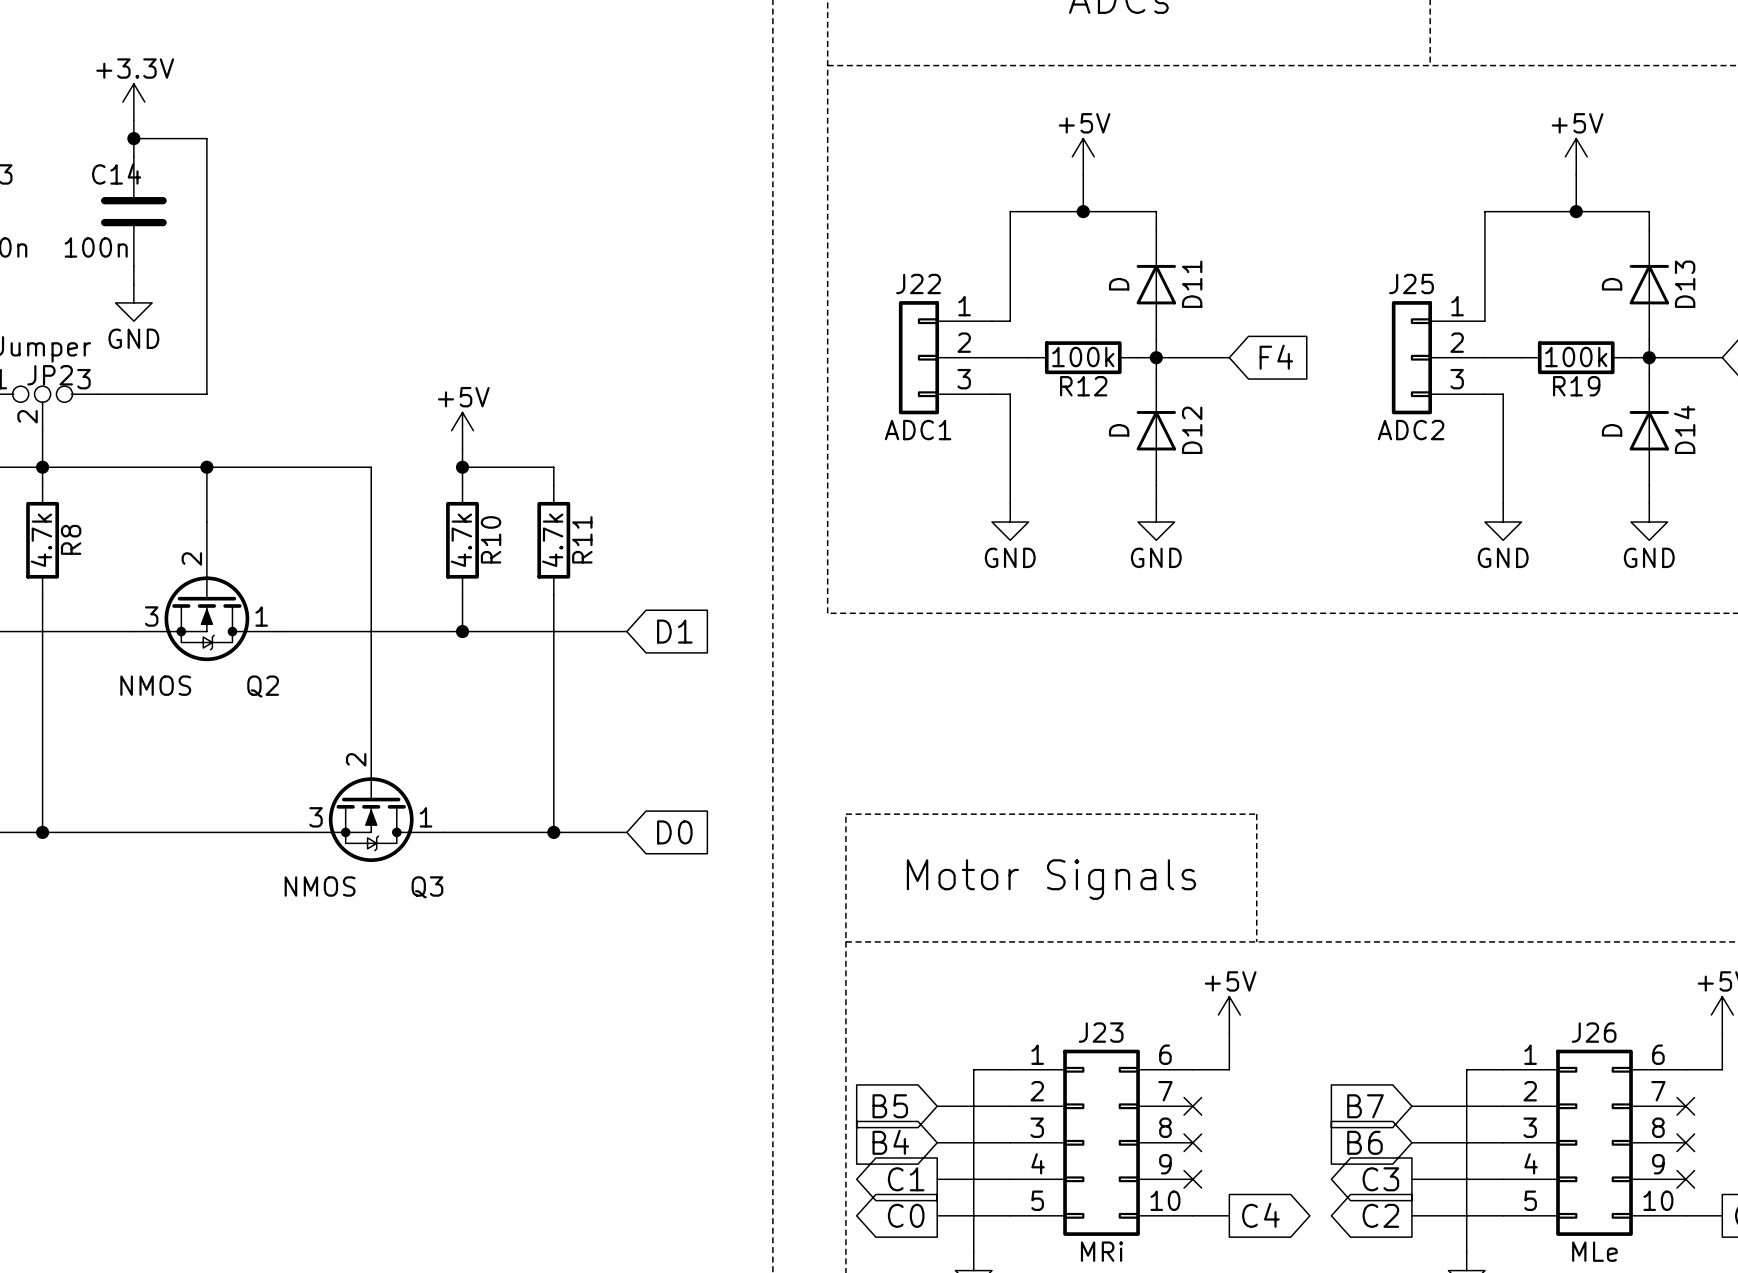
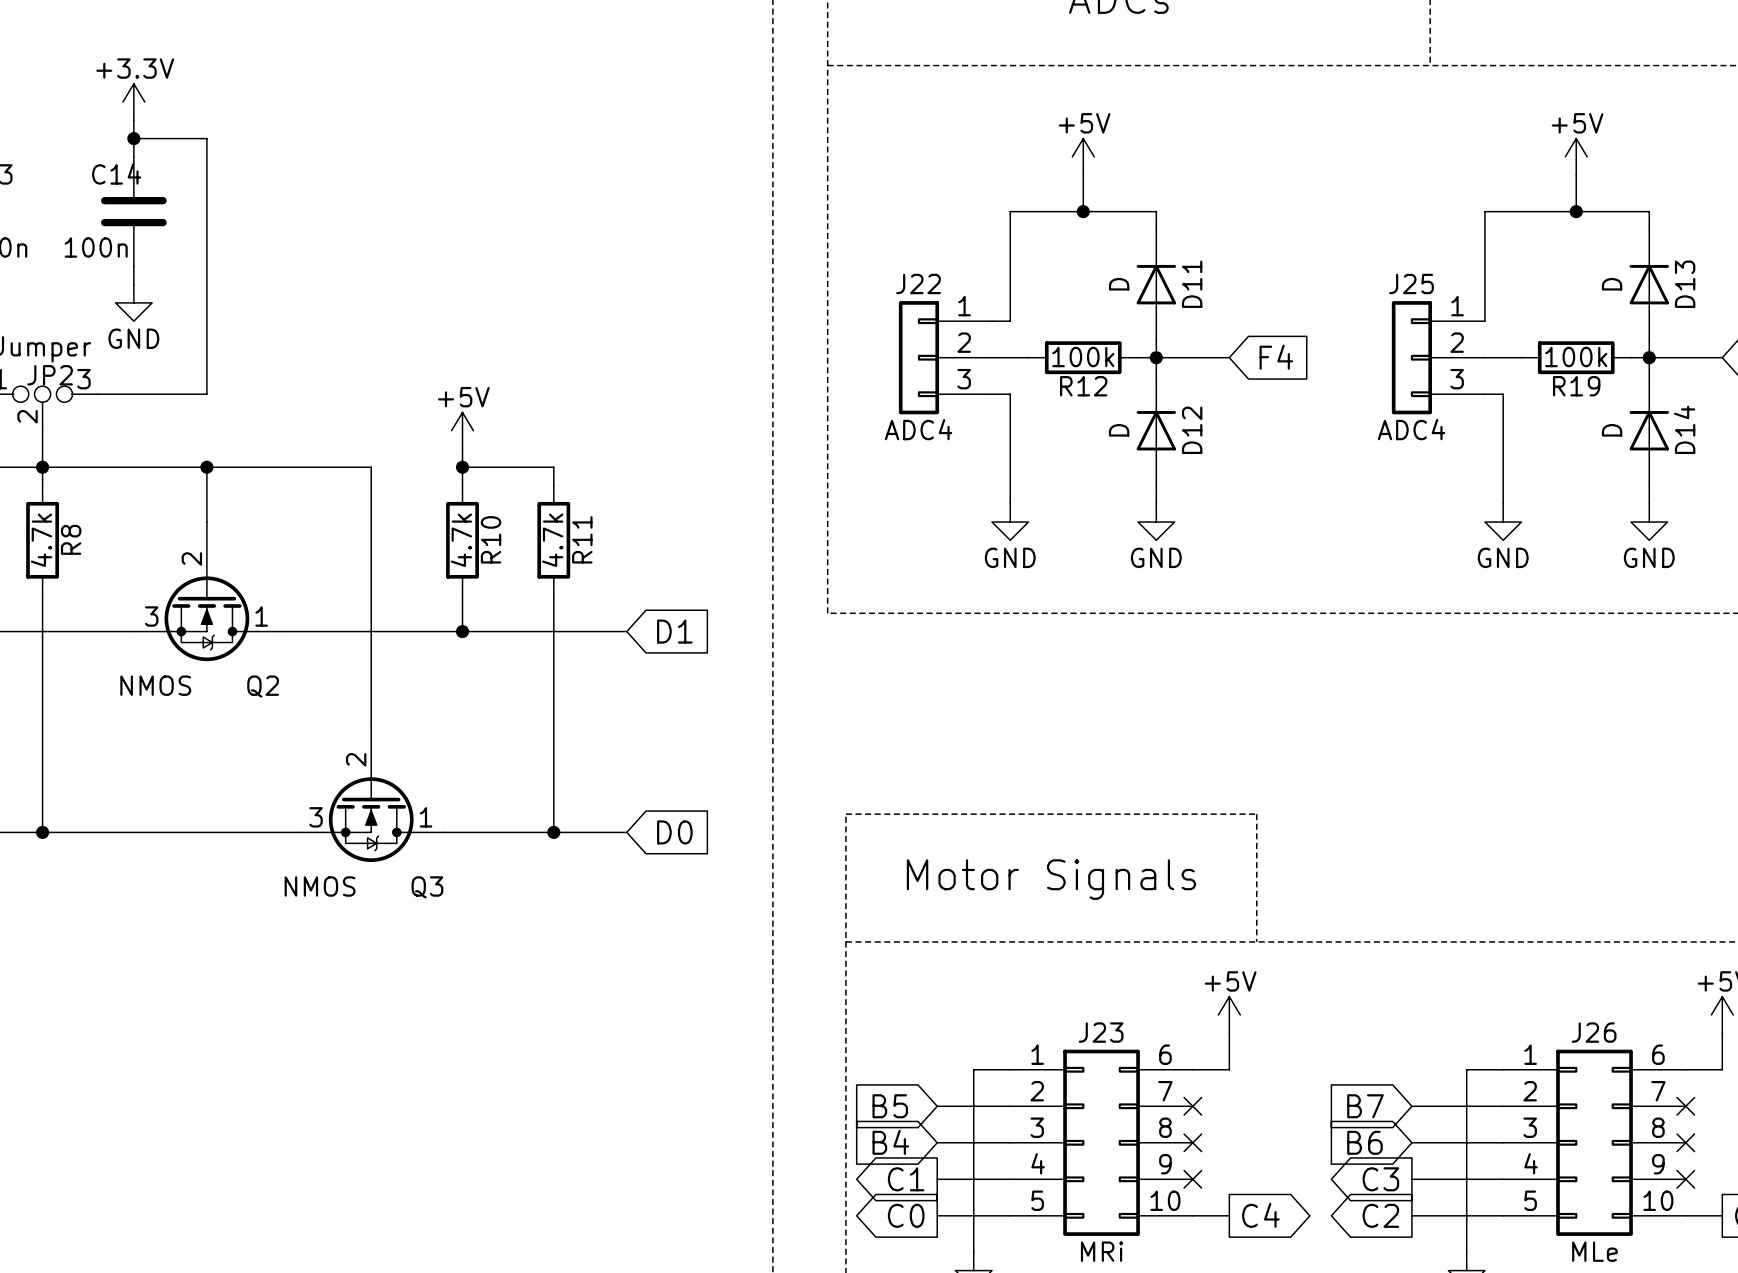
J22 value: ADC1 (918, 430) -> ADC4 (918, 429)
J25 value: ADC2 (1411, 430) -> ADC4 (1411, 429)

